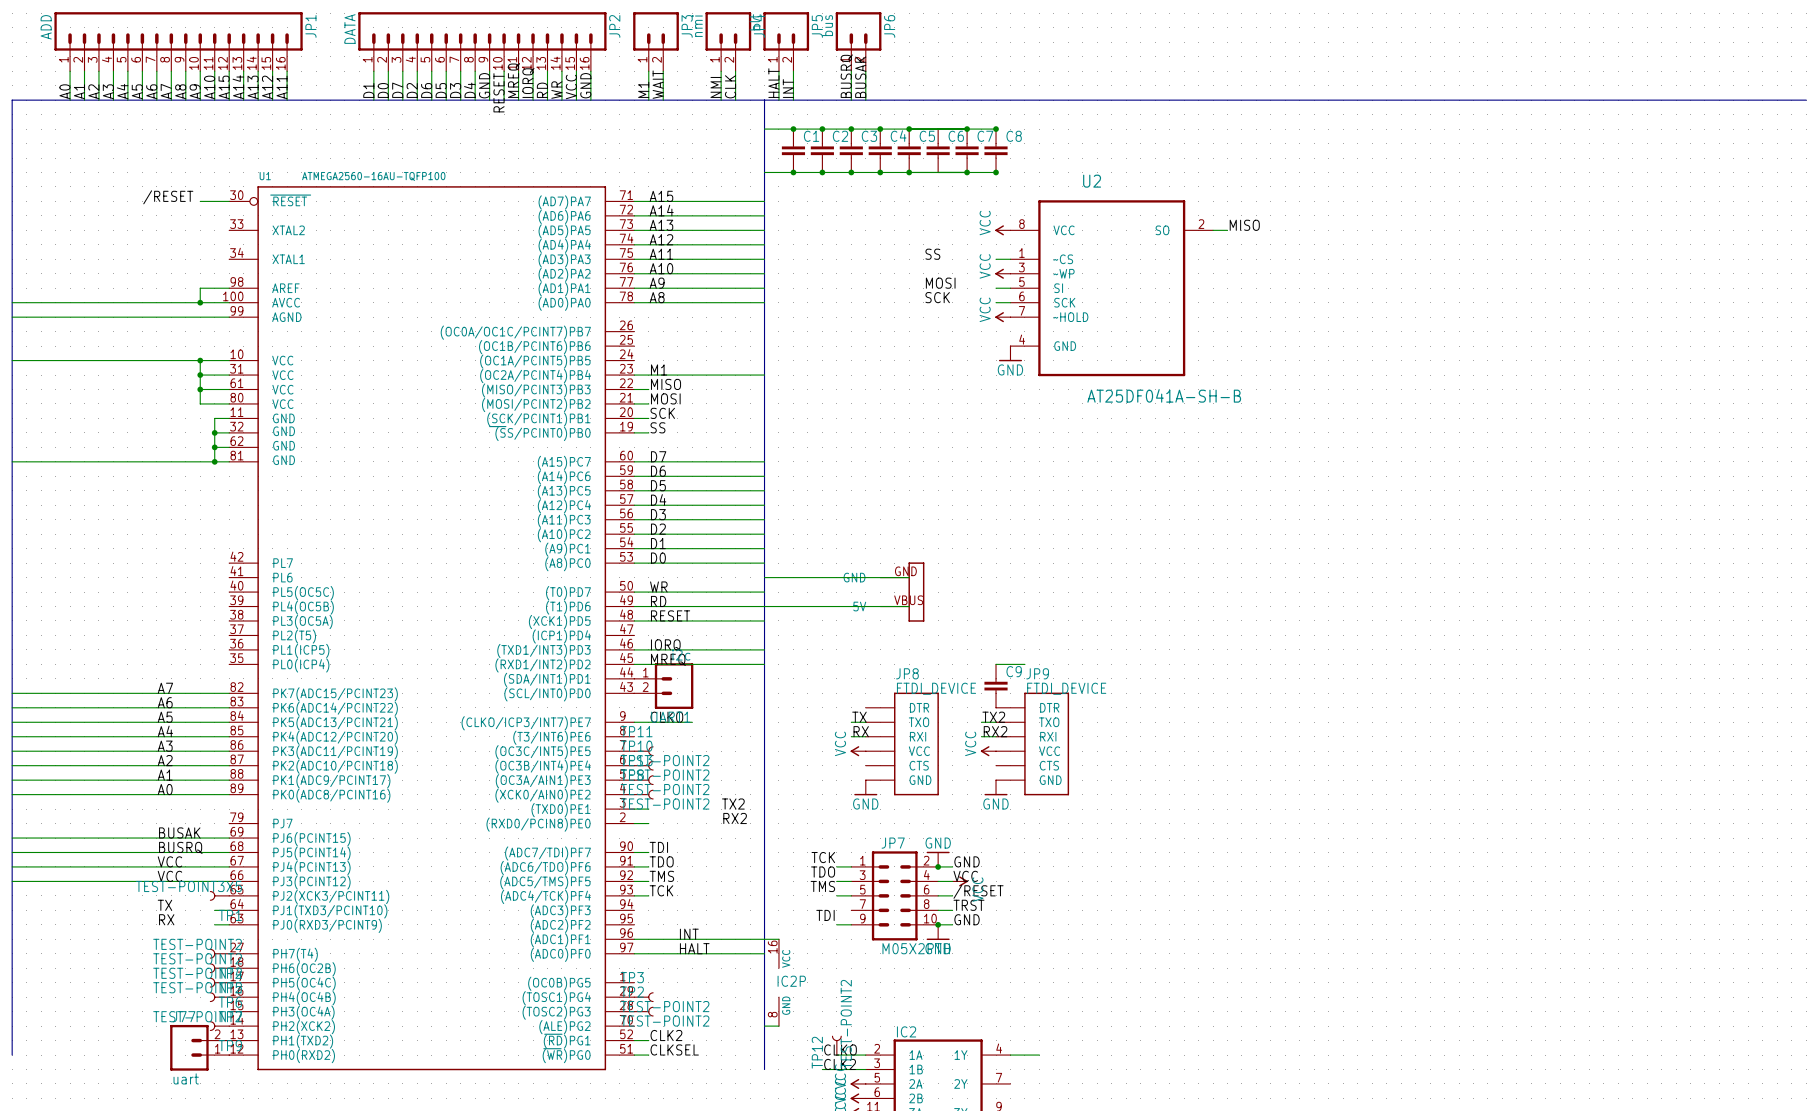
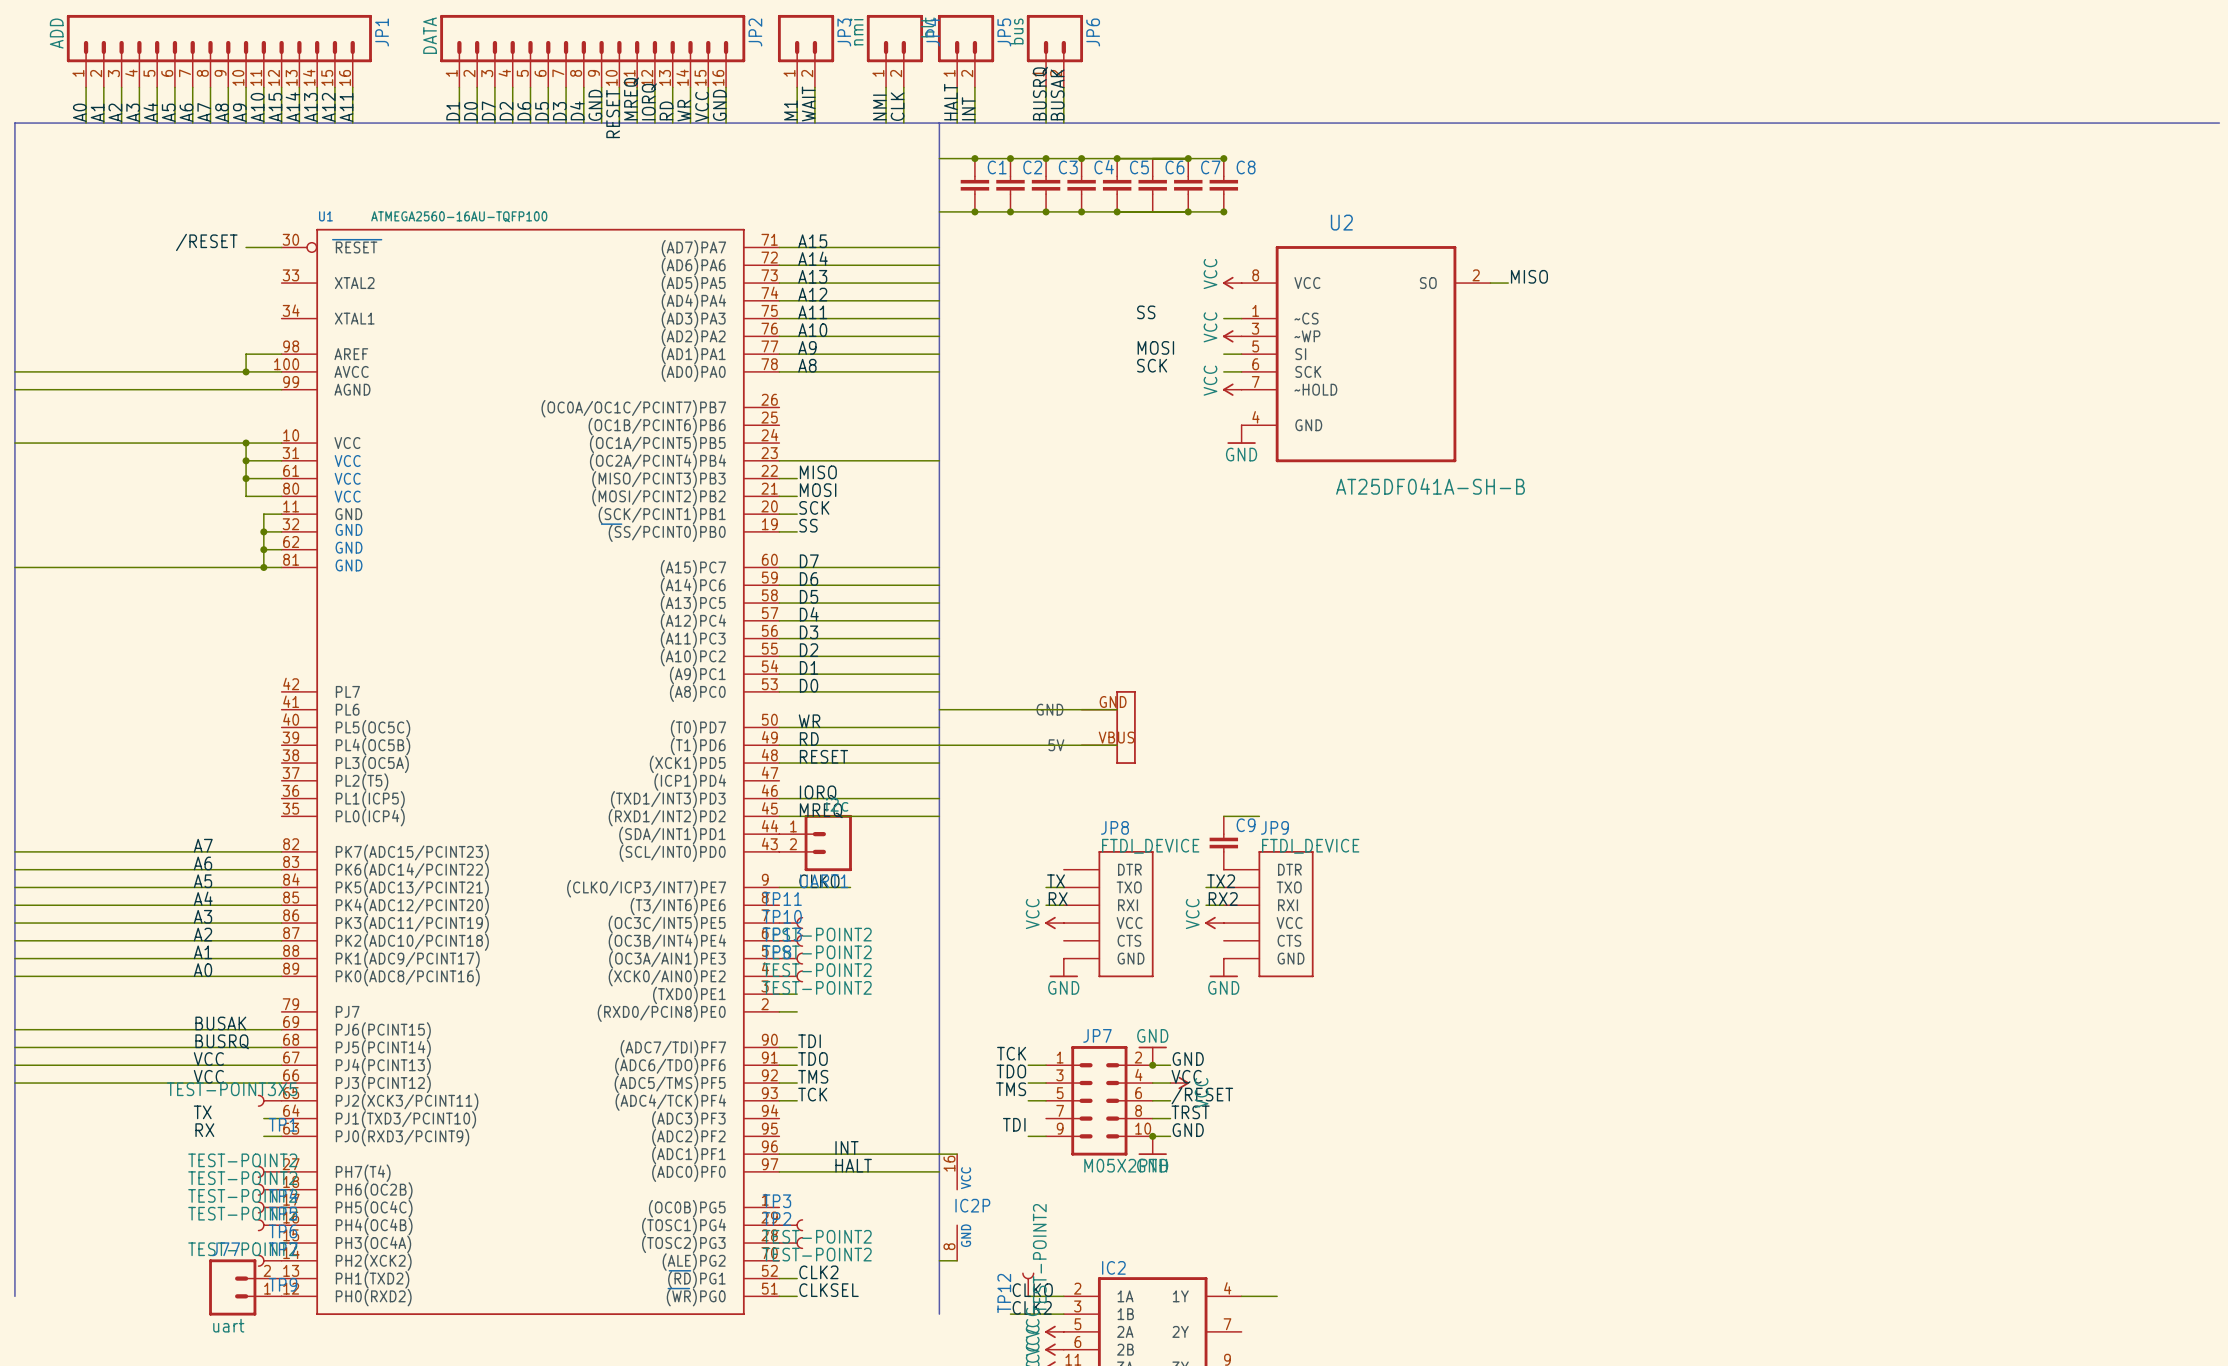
label: M1 (659, 369) -> none
label: TX2 (733, 804) -> none
label: RX2 (735, 818) -> none

